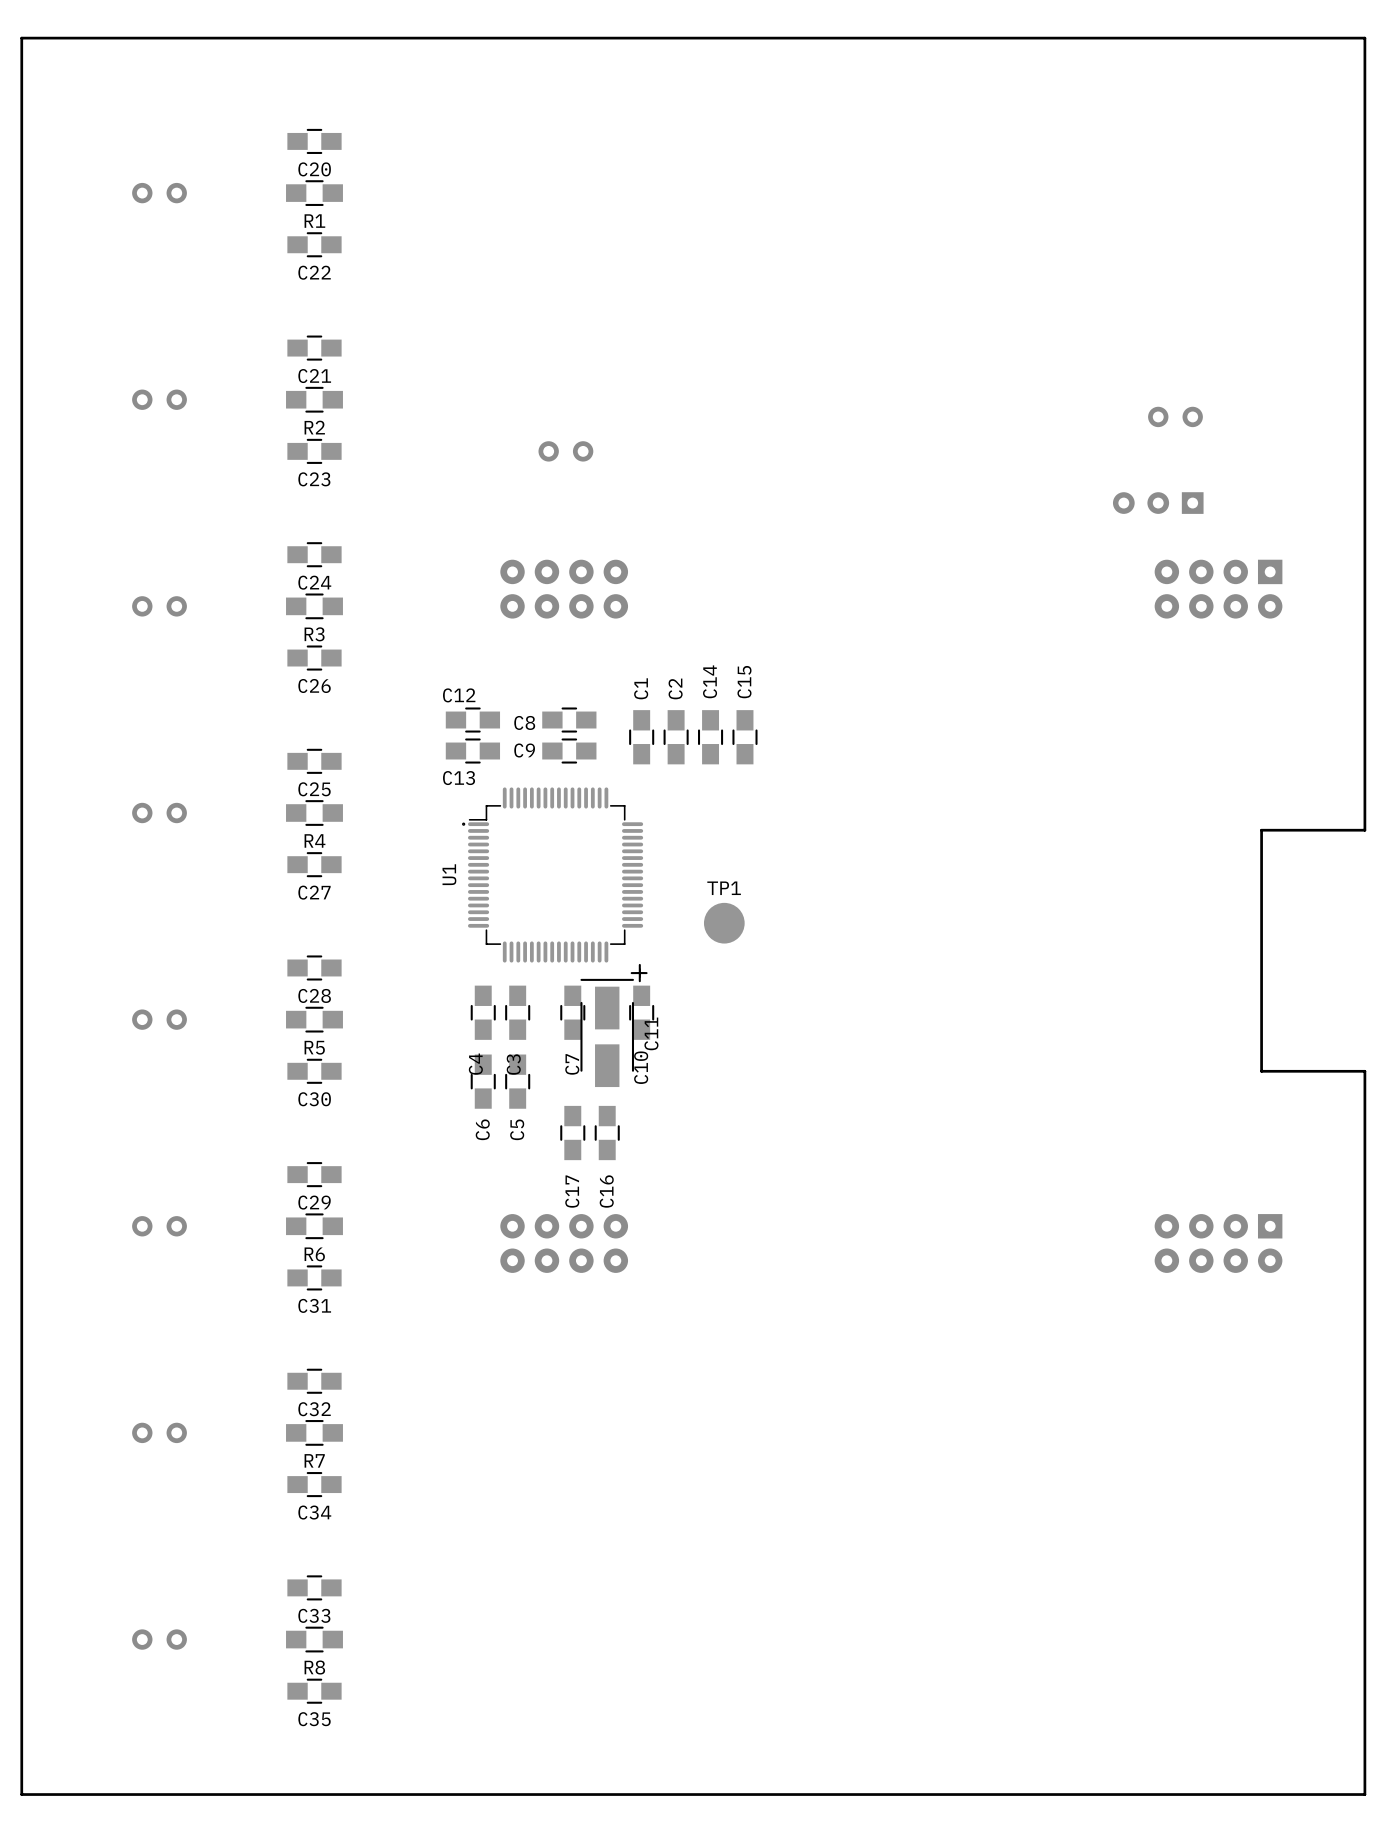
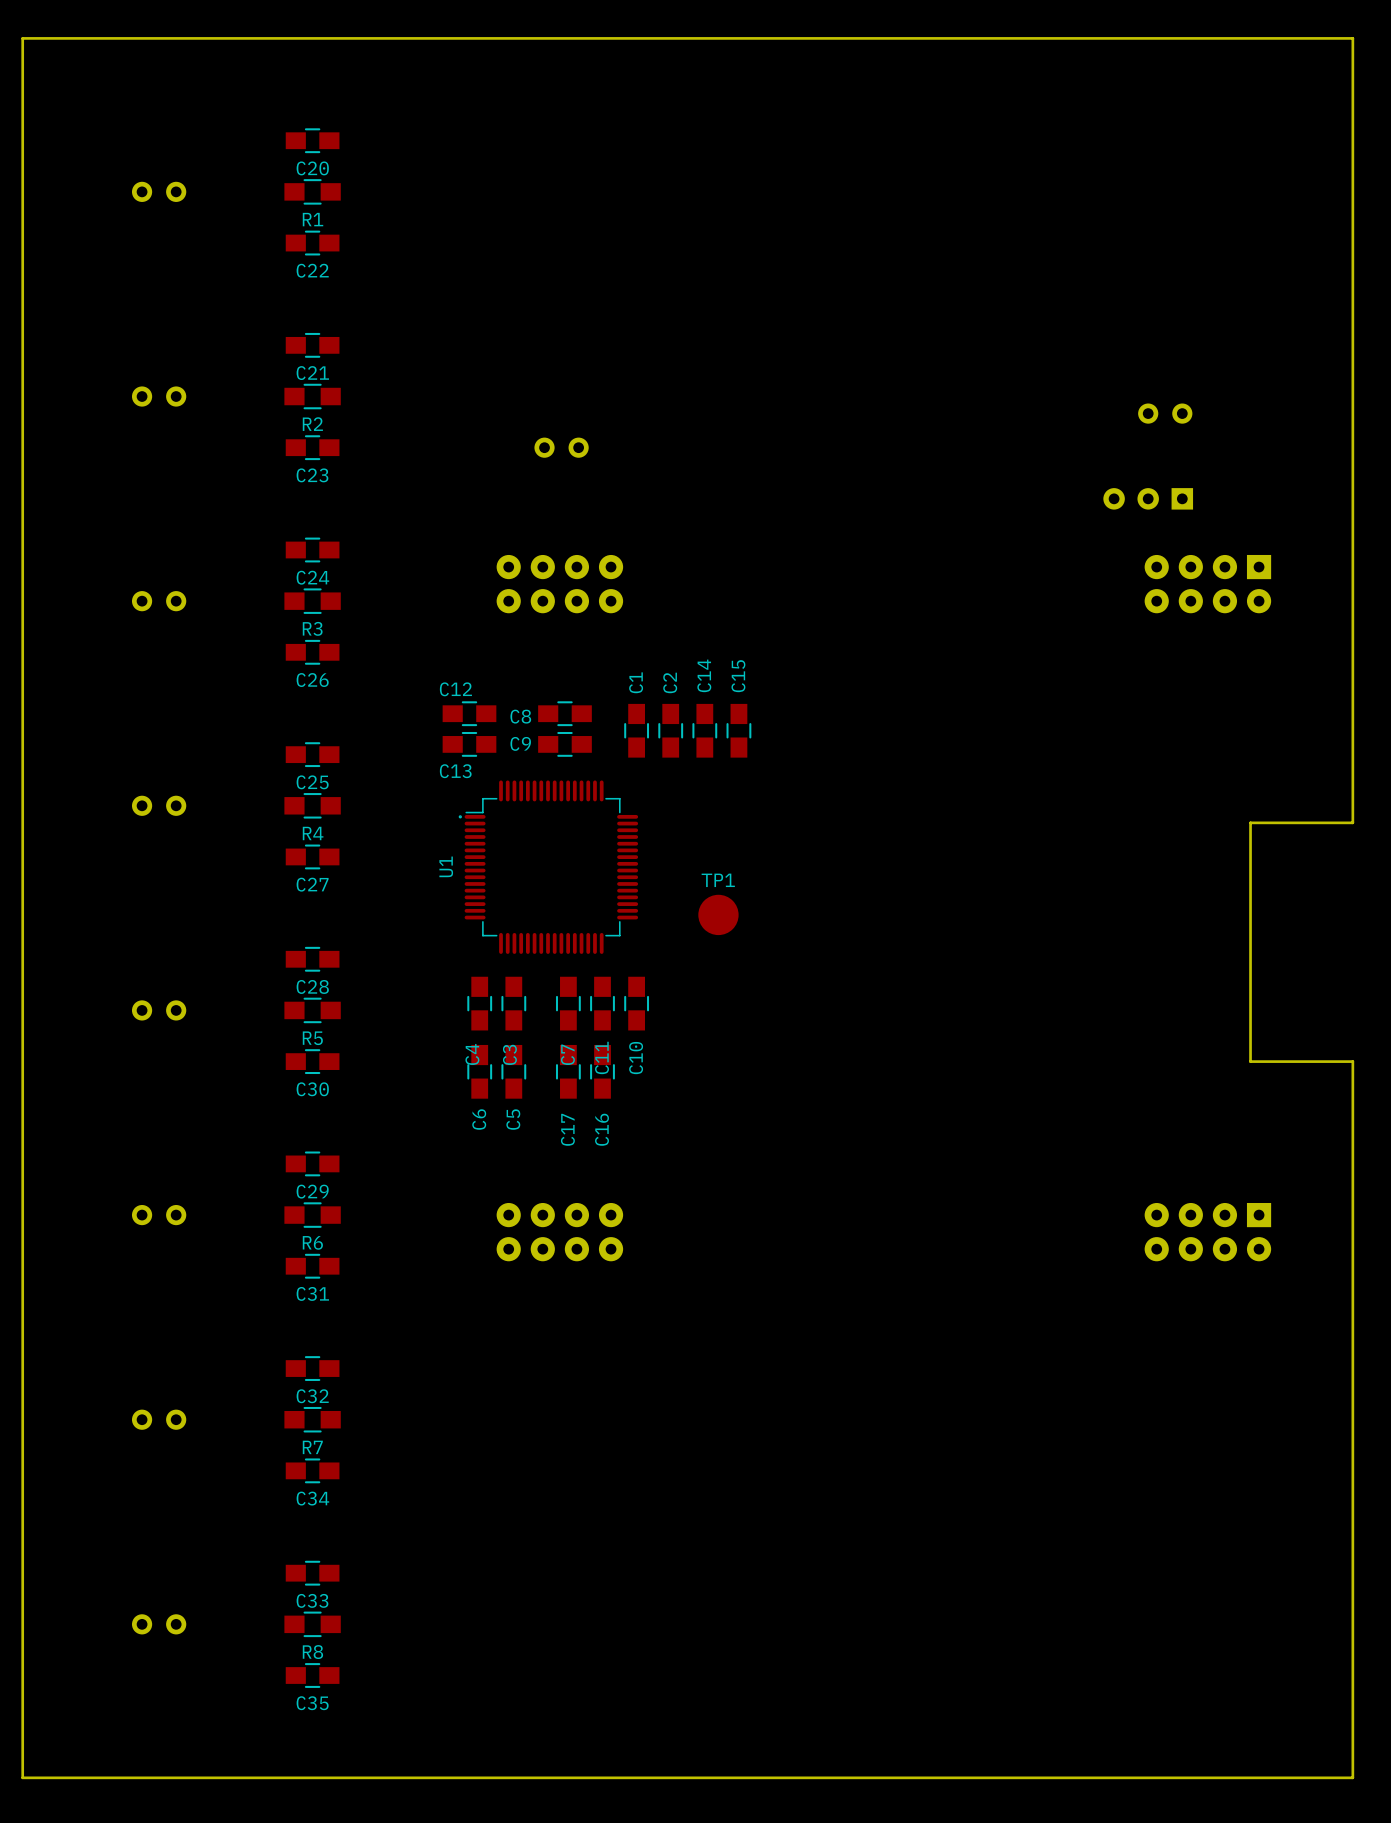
C11 footprint: [580, 963, 648, 1088] -> [590, 976, 615, 1031]
C11 name position: C11 (651, 1033) -> C11 (602, 1057)
C17 position: (572, 1133) -> (568, 1071)
C16 position: (607, 1133) -> (602, 1071)

